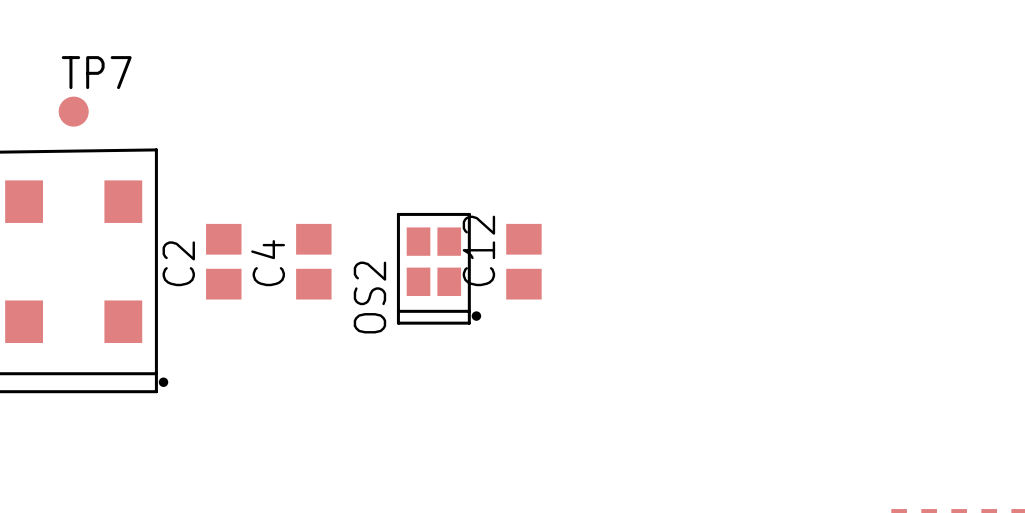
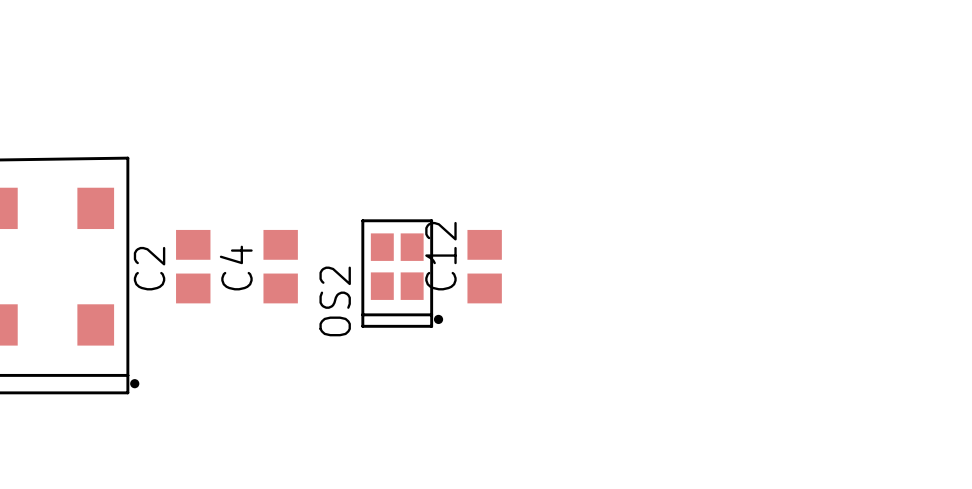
TP7: (73, 111) -> none

